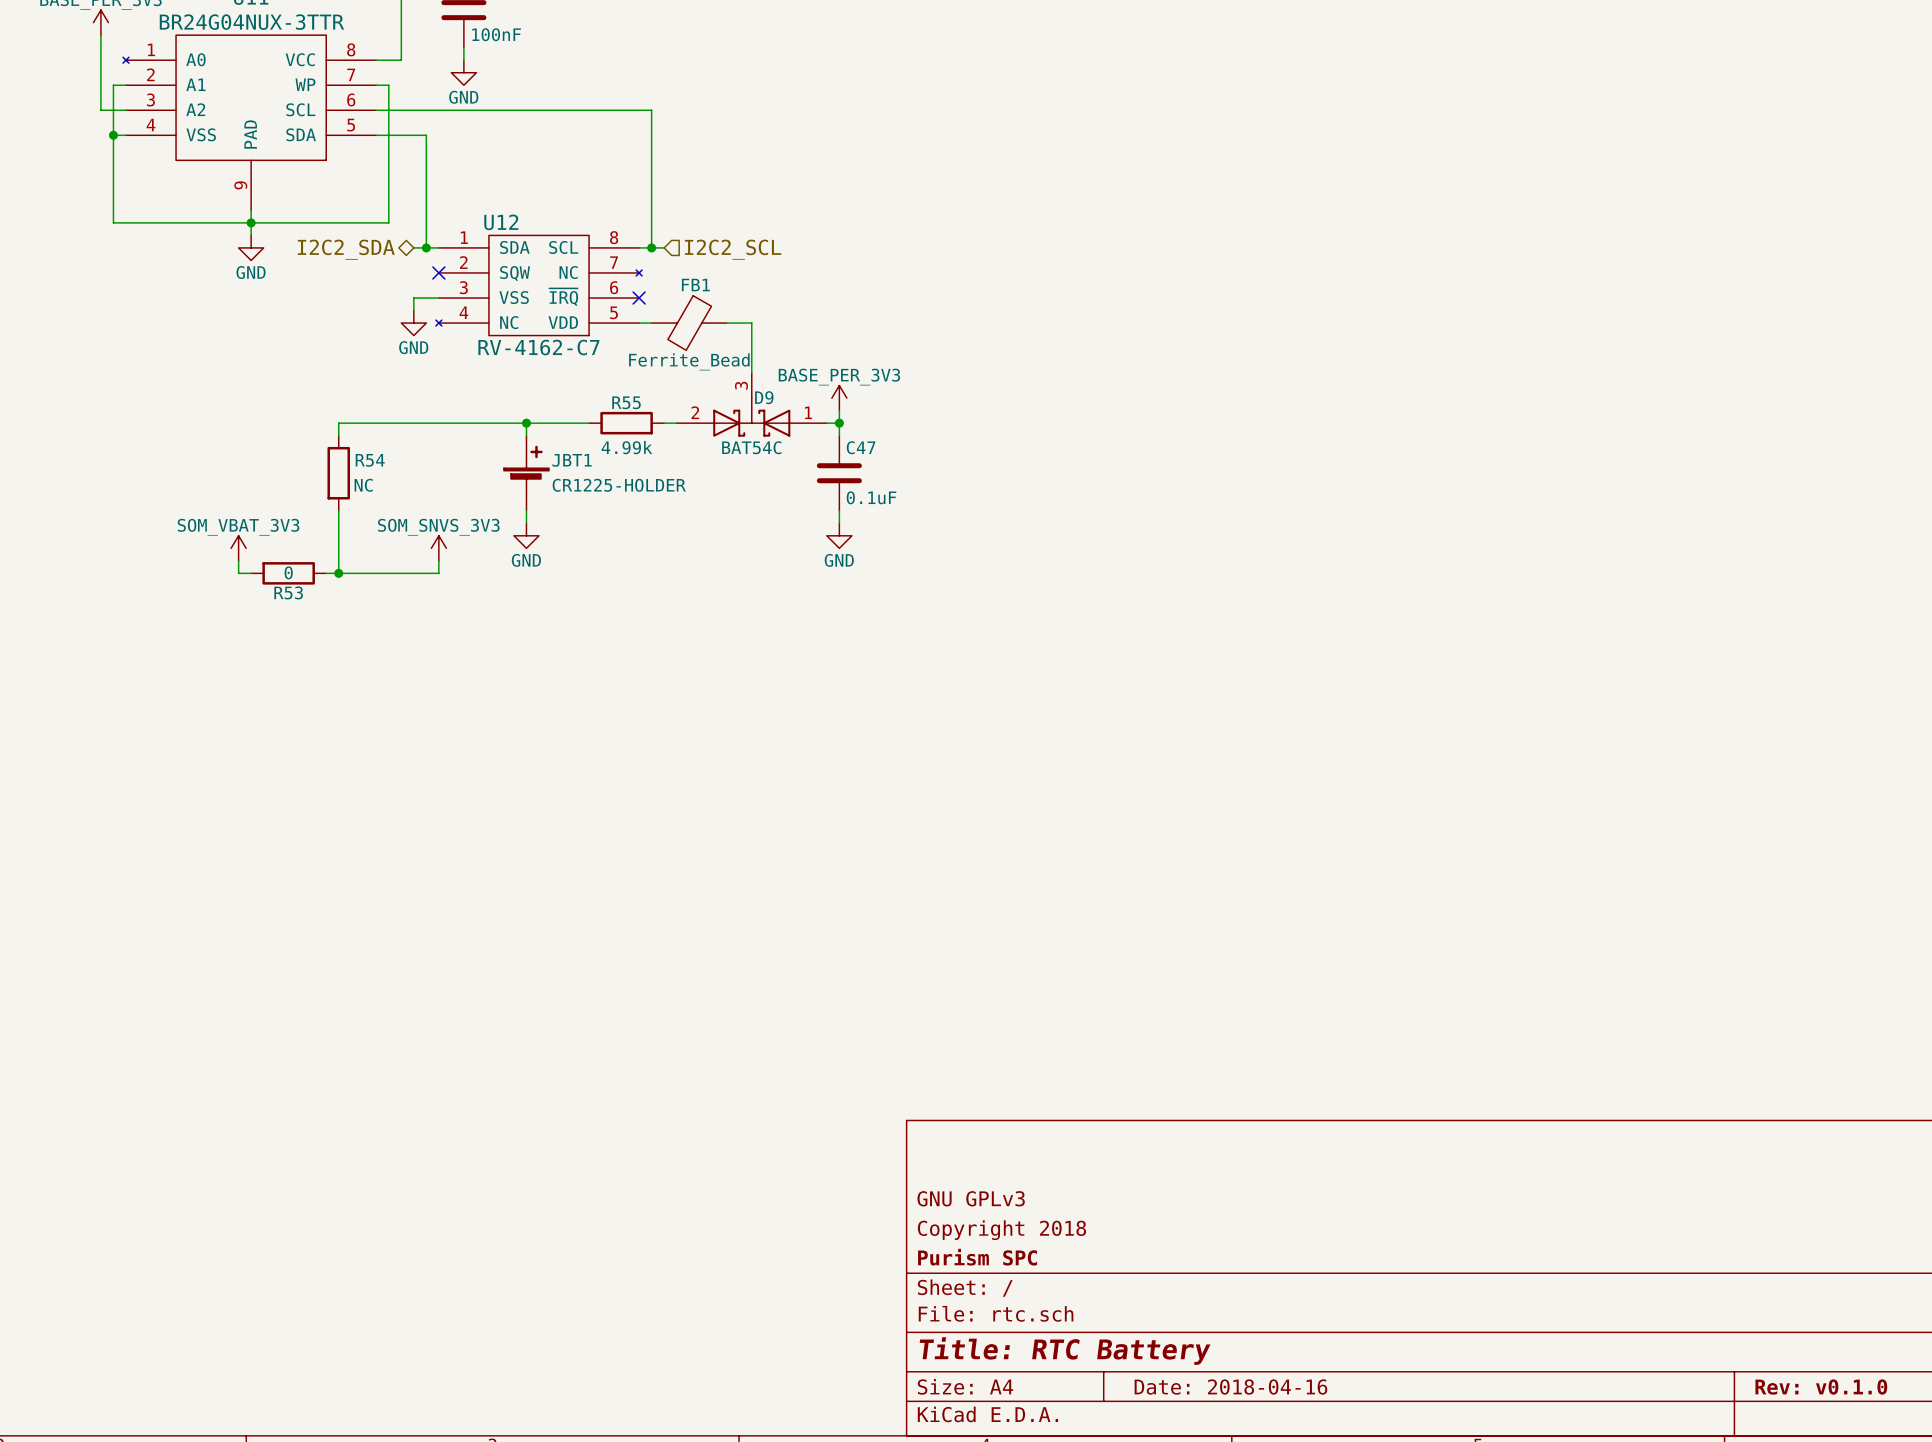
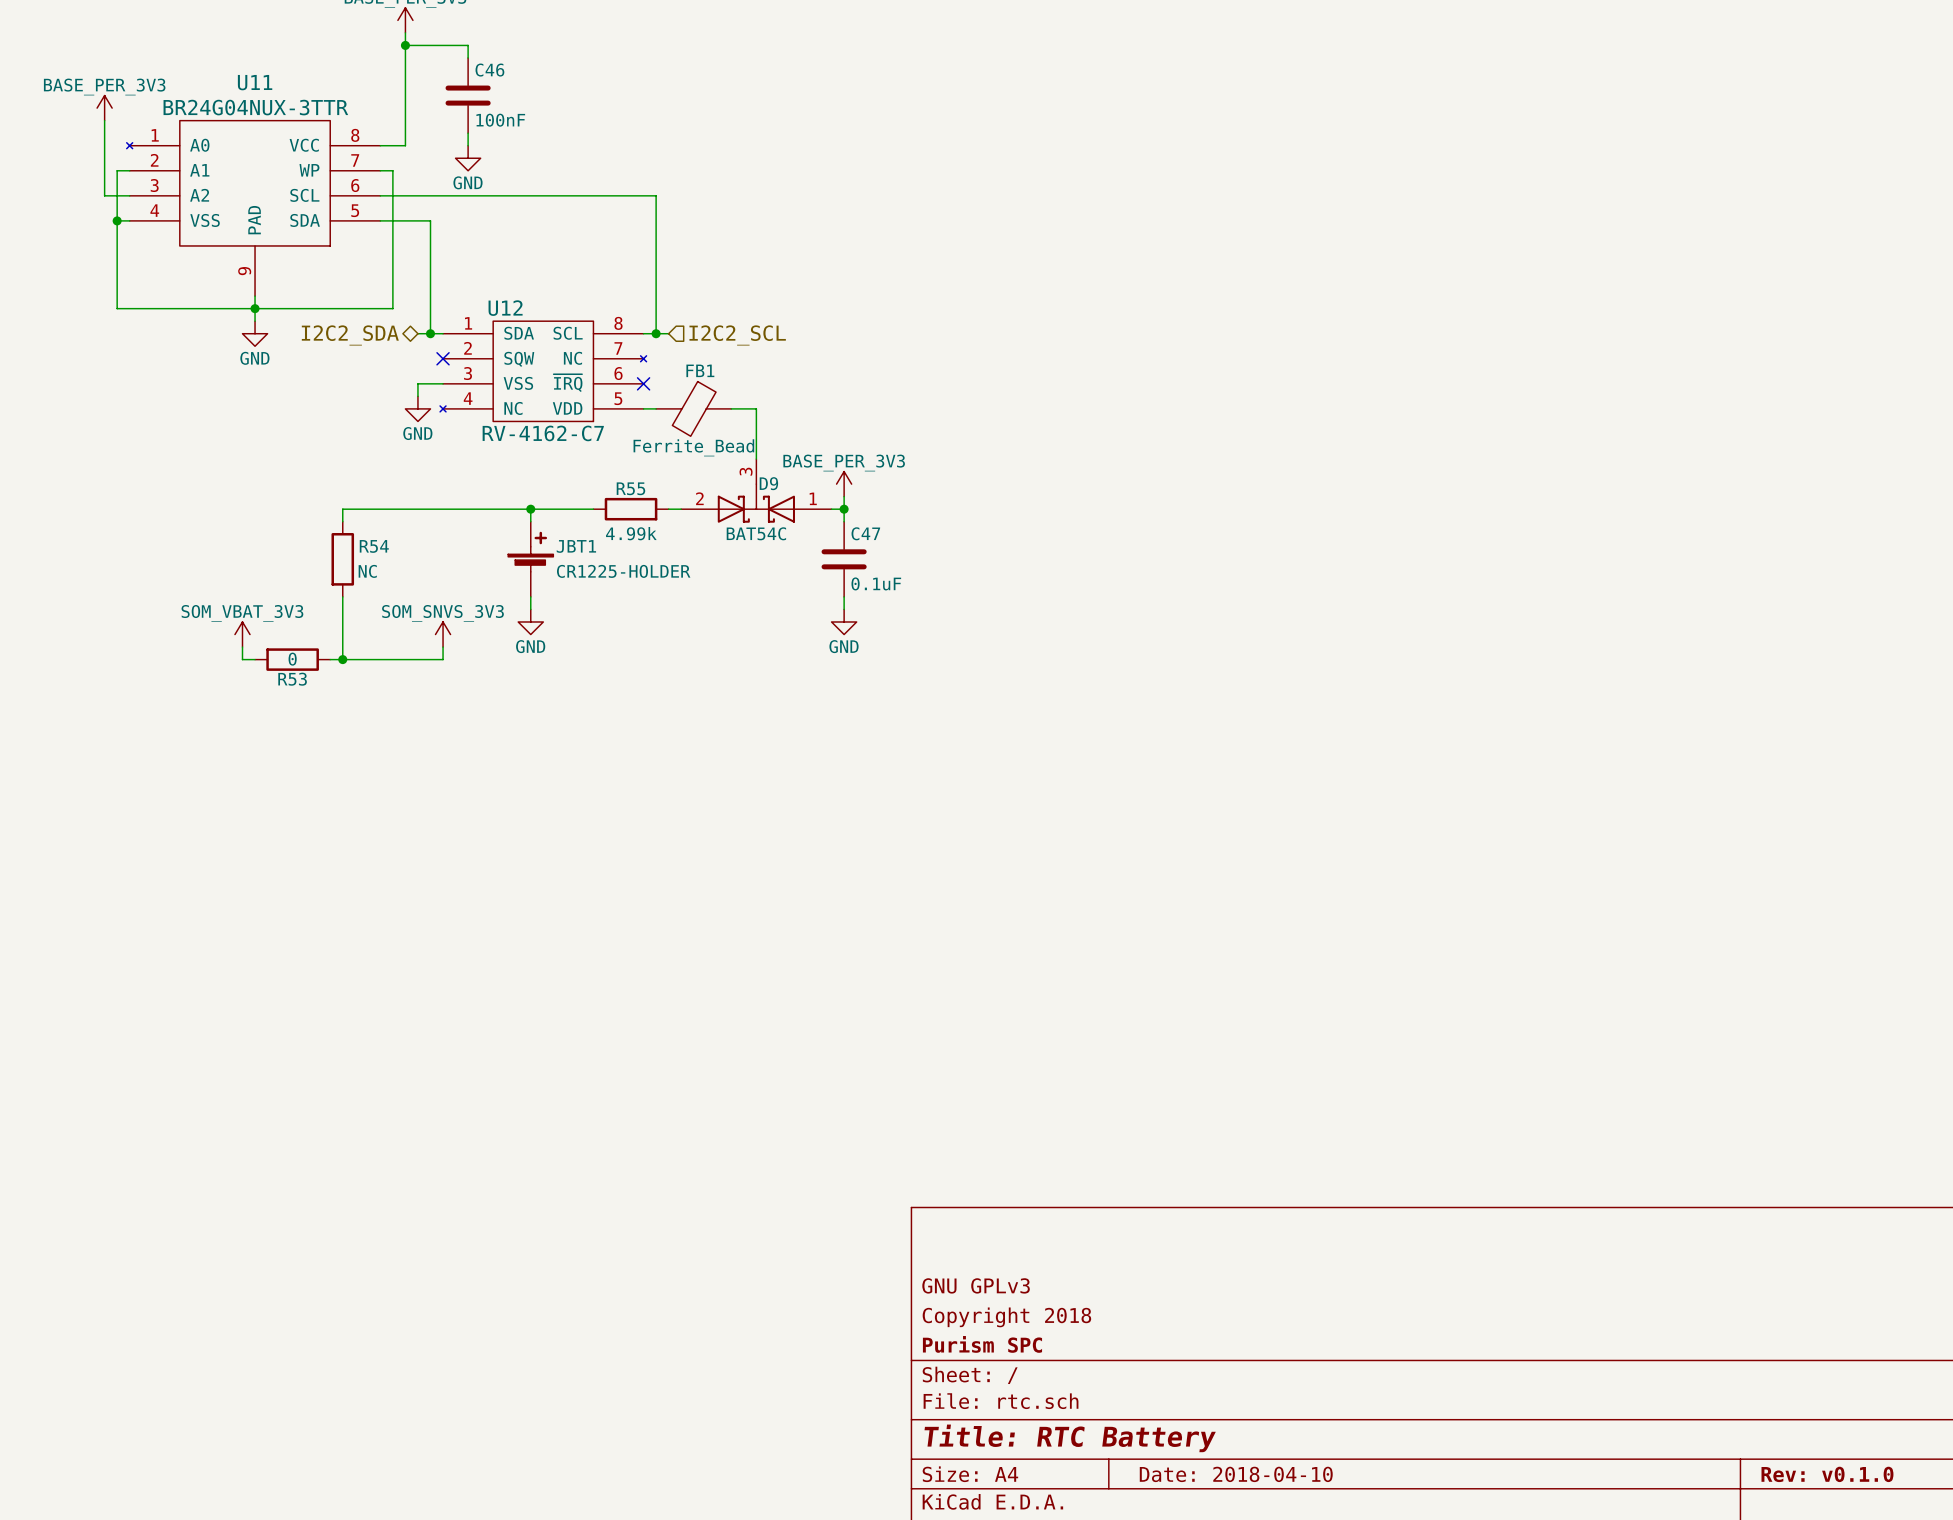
title block: Date: 2018-04-16 (1230, 1387) -> Date: 2018-04-10 (1236, 1474)

